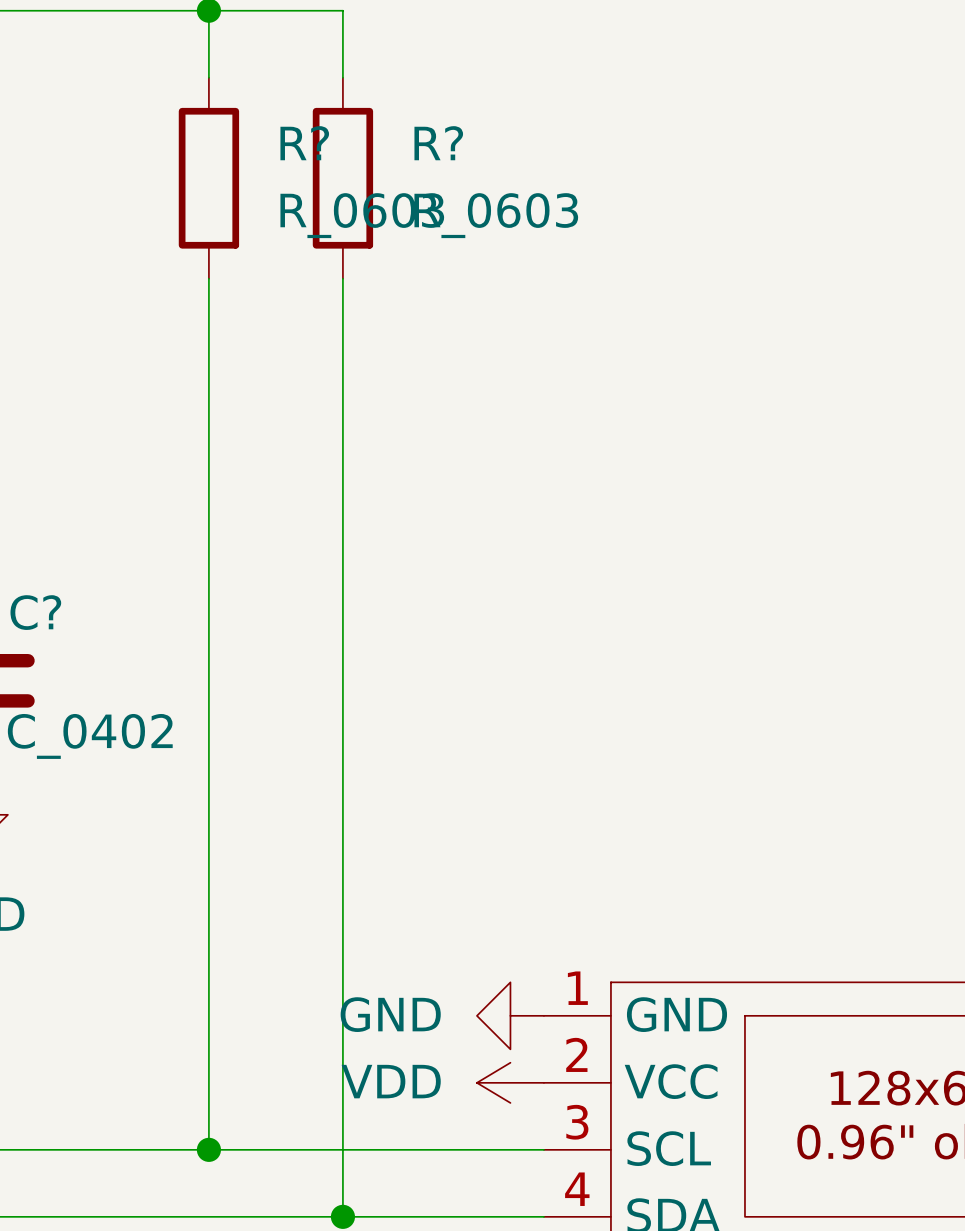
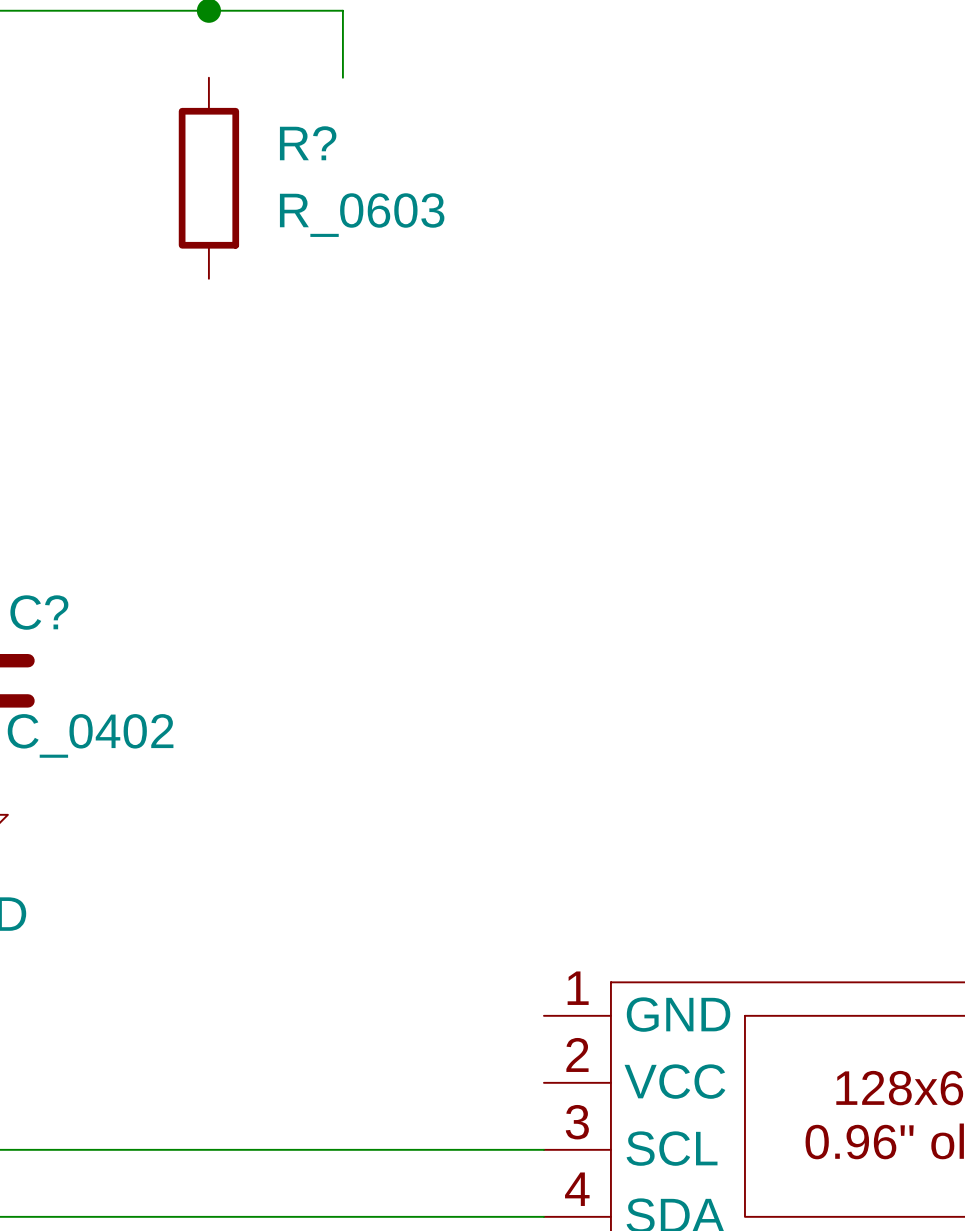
wire: (208, 10) (208, 77) -> none
R?: R_0603 (342, 178) -> none
wire: (208, 278) (208, 1149) -> none
wire: (342, 278) (342, 1216) -> none
power symbol: GND (510, 1015) -> none
power symbol: VDD (510, 1082) -> none
junction: (208, 1149) -> none
junction: (342, 1216) -> none

